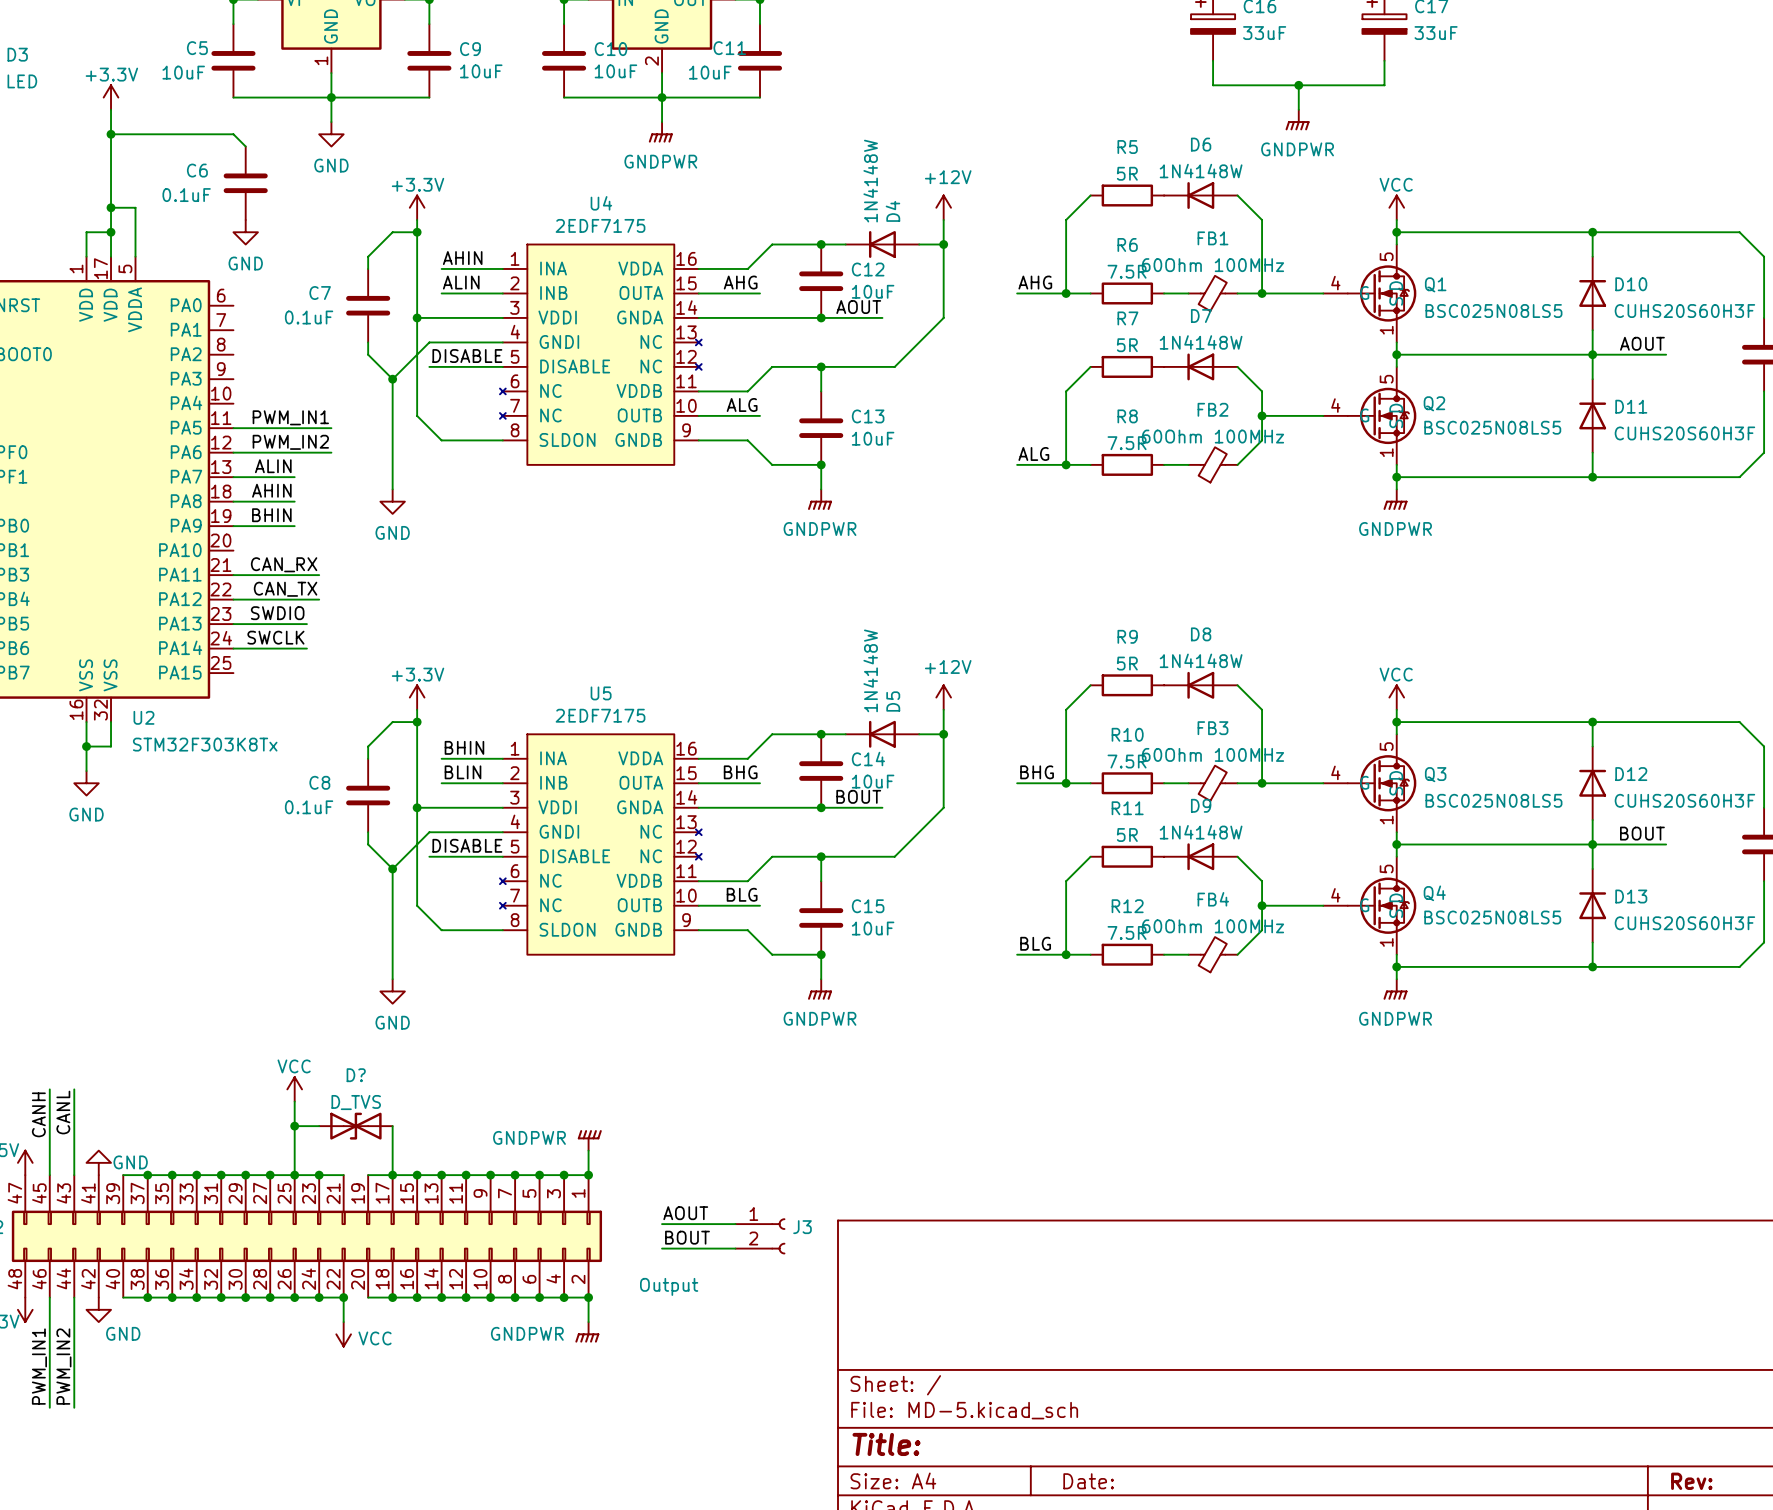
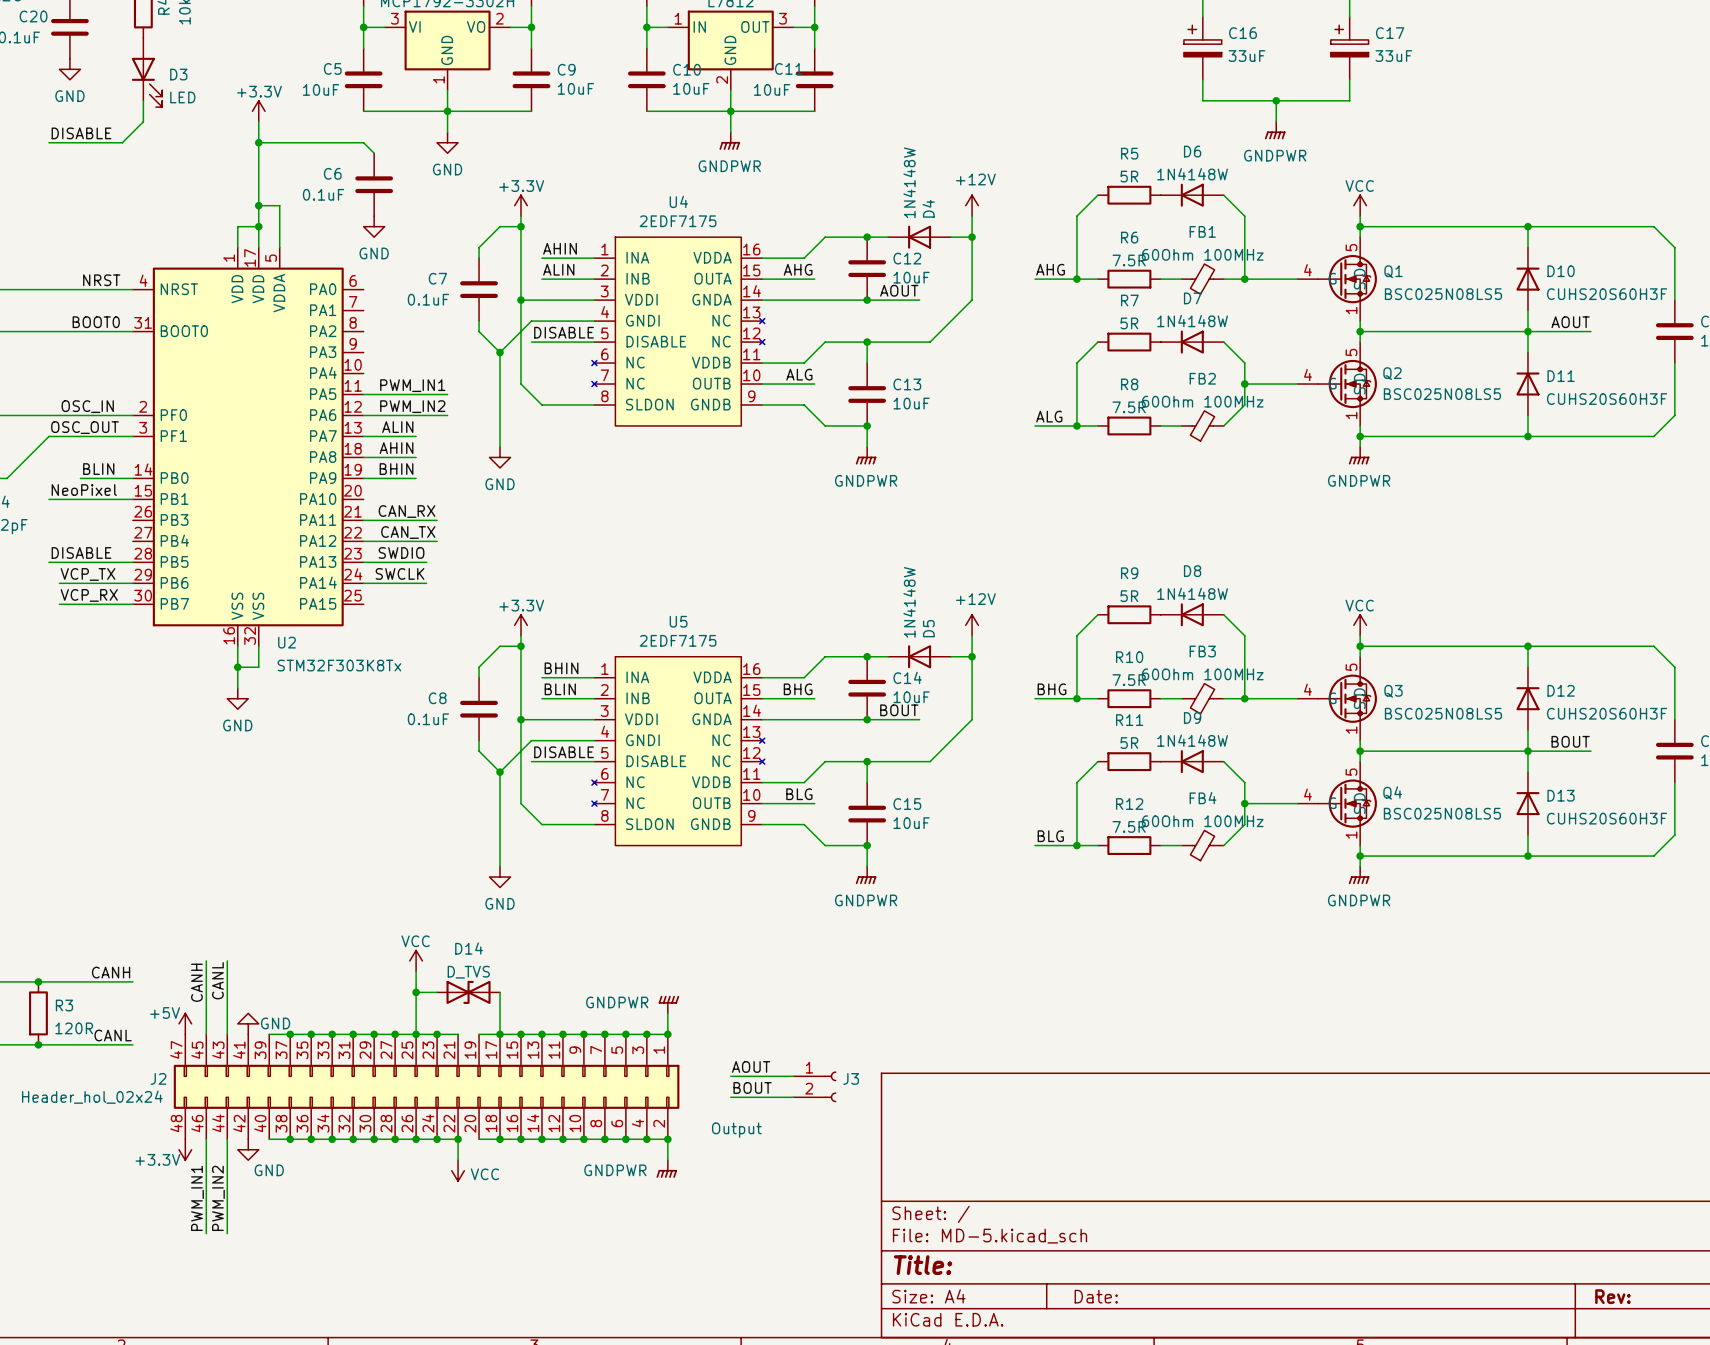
D? name: D? (356, 1075) -> D14 (469, 948)

